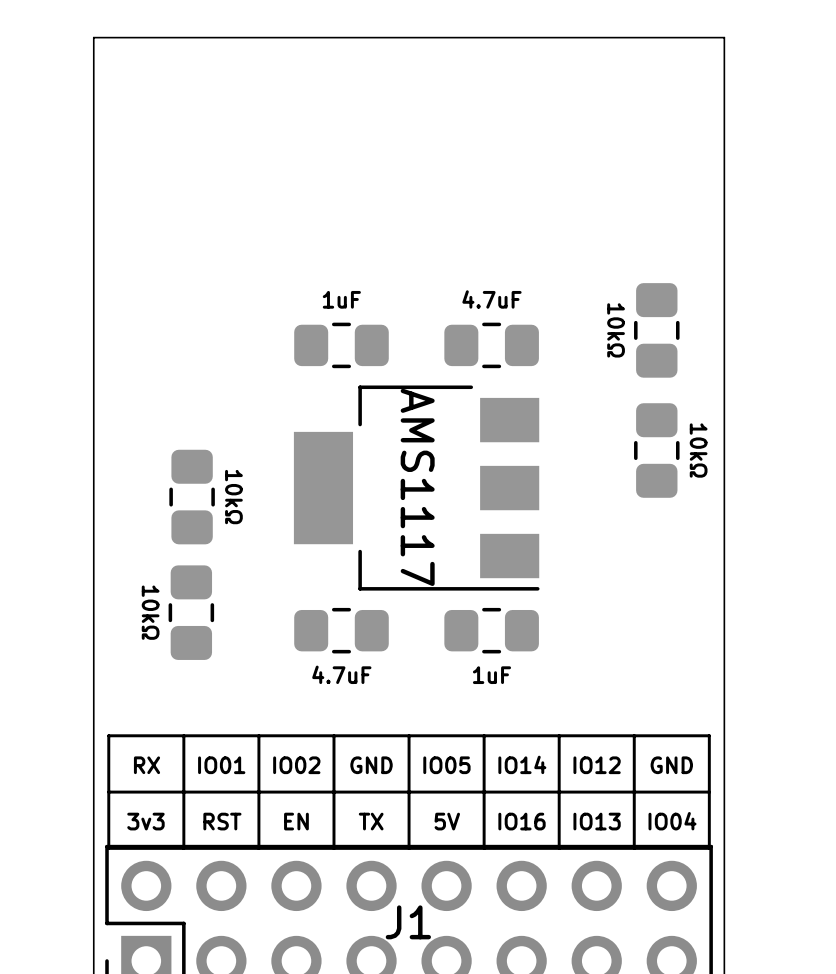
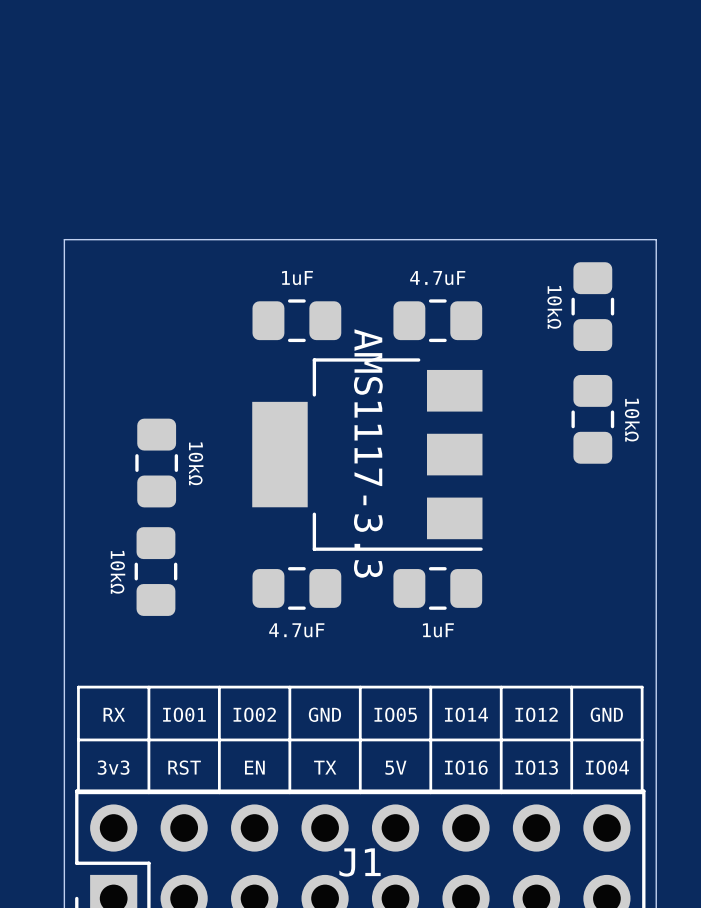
board edge: (724, 259) (724, 37) (93, 37) (93, 259) -> (656, 239) (64, 239)
part value: AMS1117 (417, 487) -> AMS1117-3.3 (368, 453)

